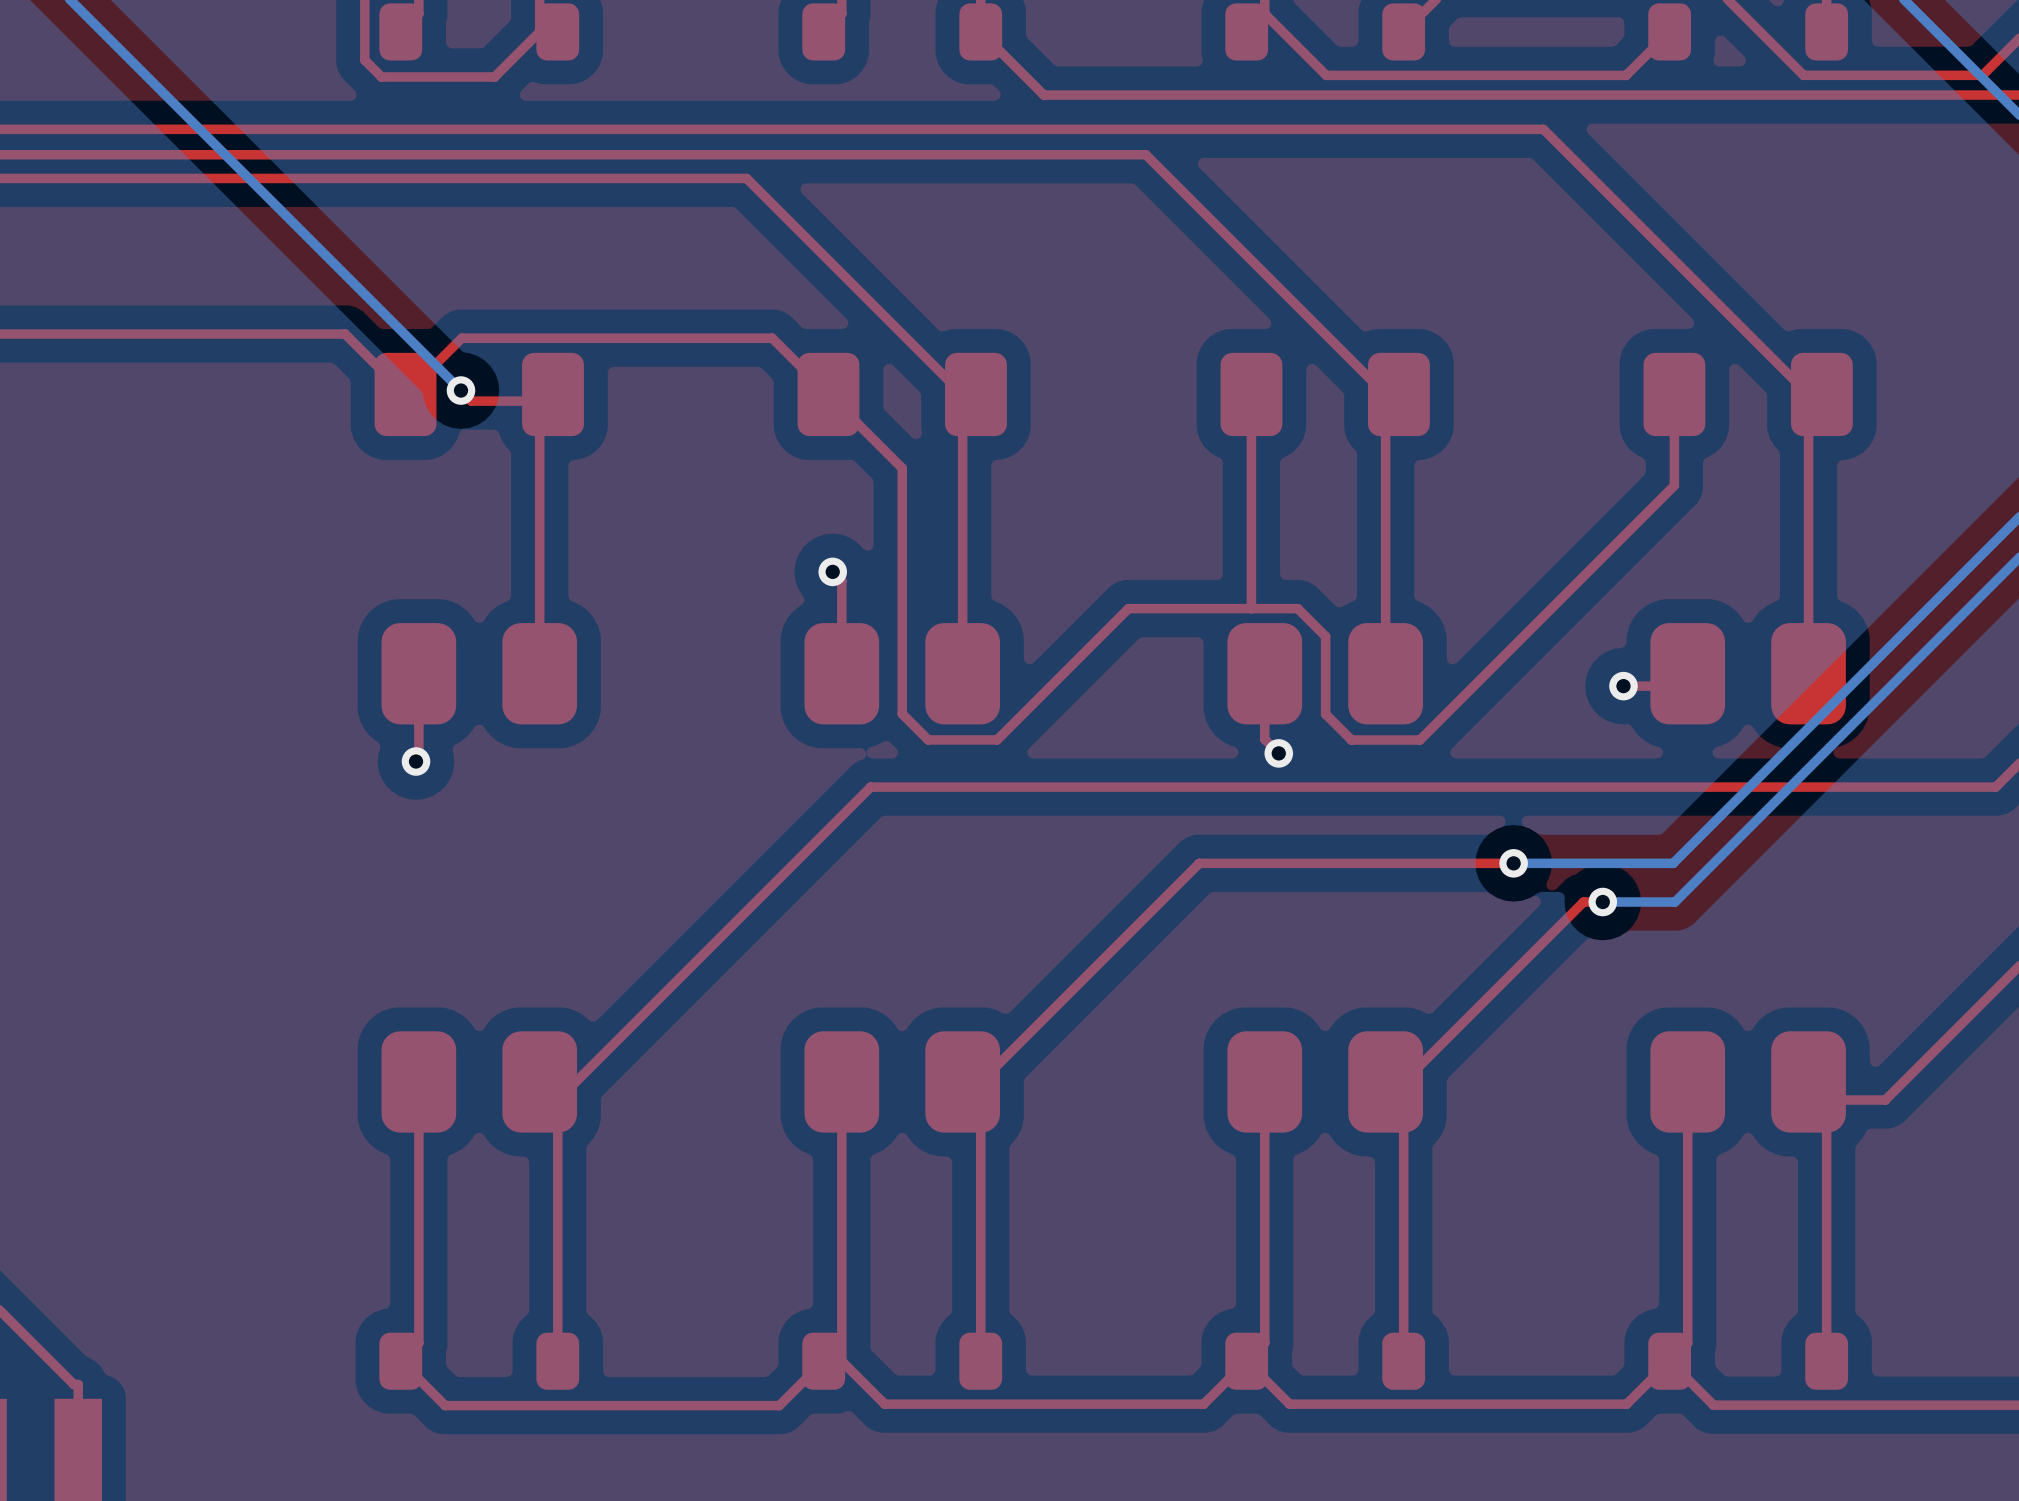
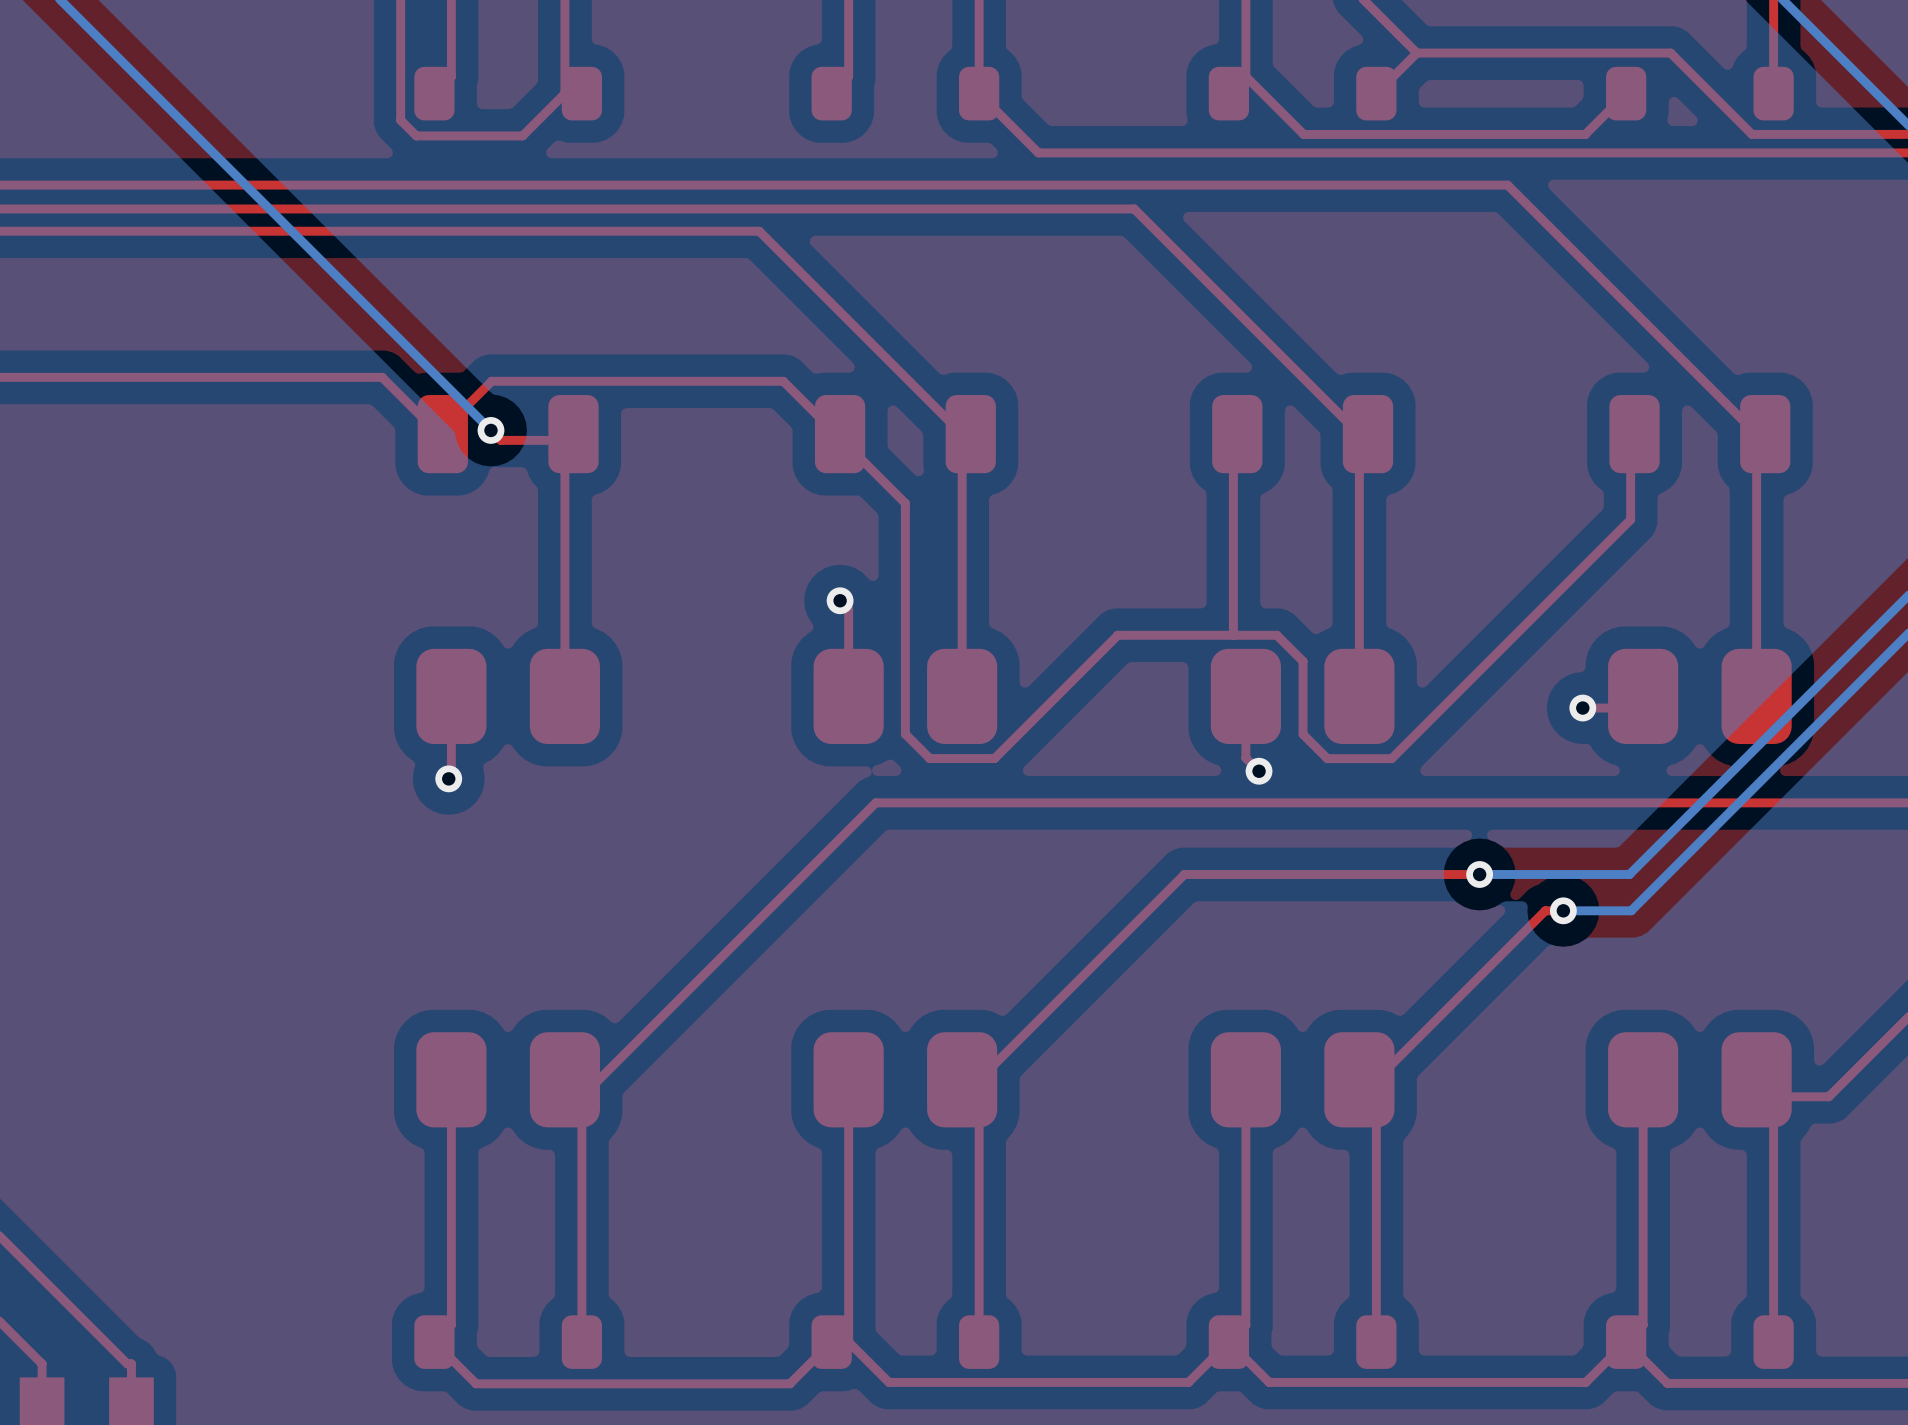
part footprint: [374, 352, 584, 437] -> [417, 395, 599, 474]
part footprint: [797, 352, 1007, 437] -> [814, 395, 996, 474]
part footprint: [1220, 352, 1430, 437] -> [1212, 395, 1394, 474]
part footprint: [1643, 352, 1853, 437] -> [1609, 395, 1791, 474]

